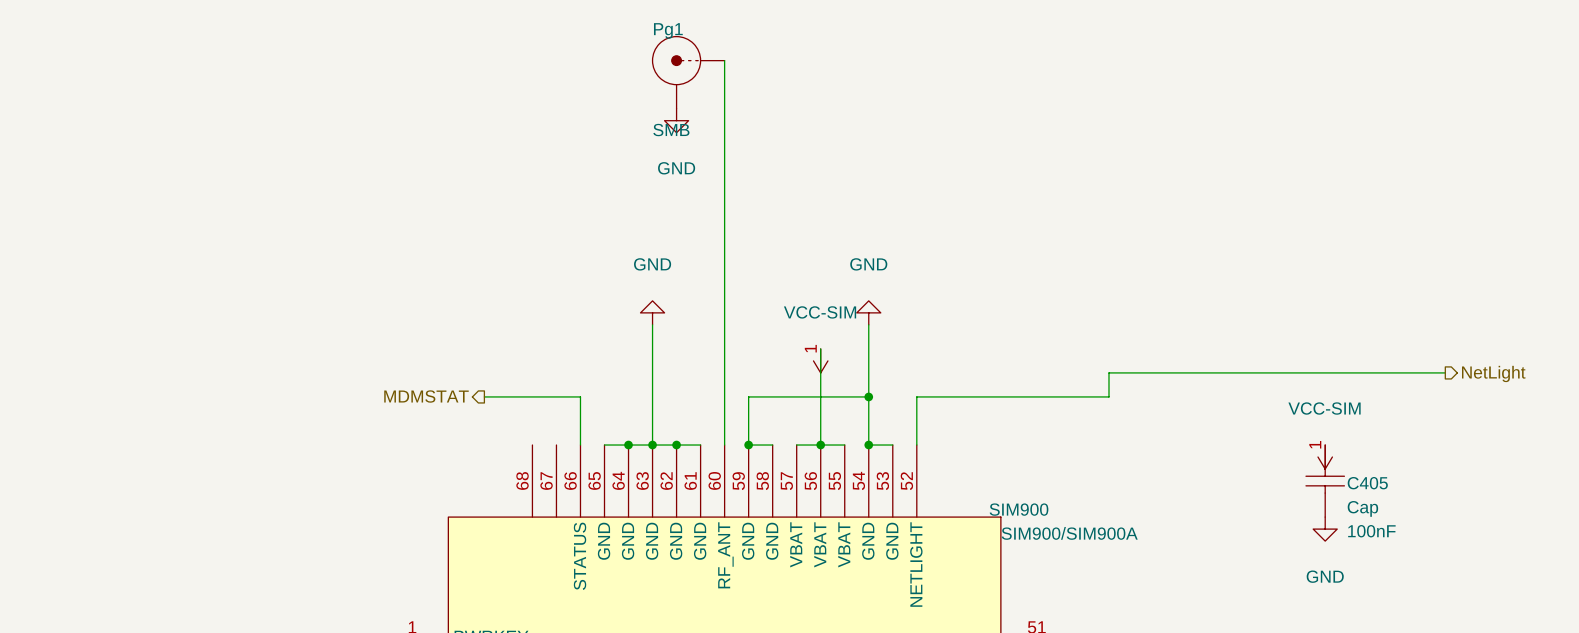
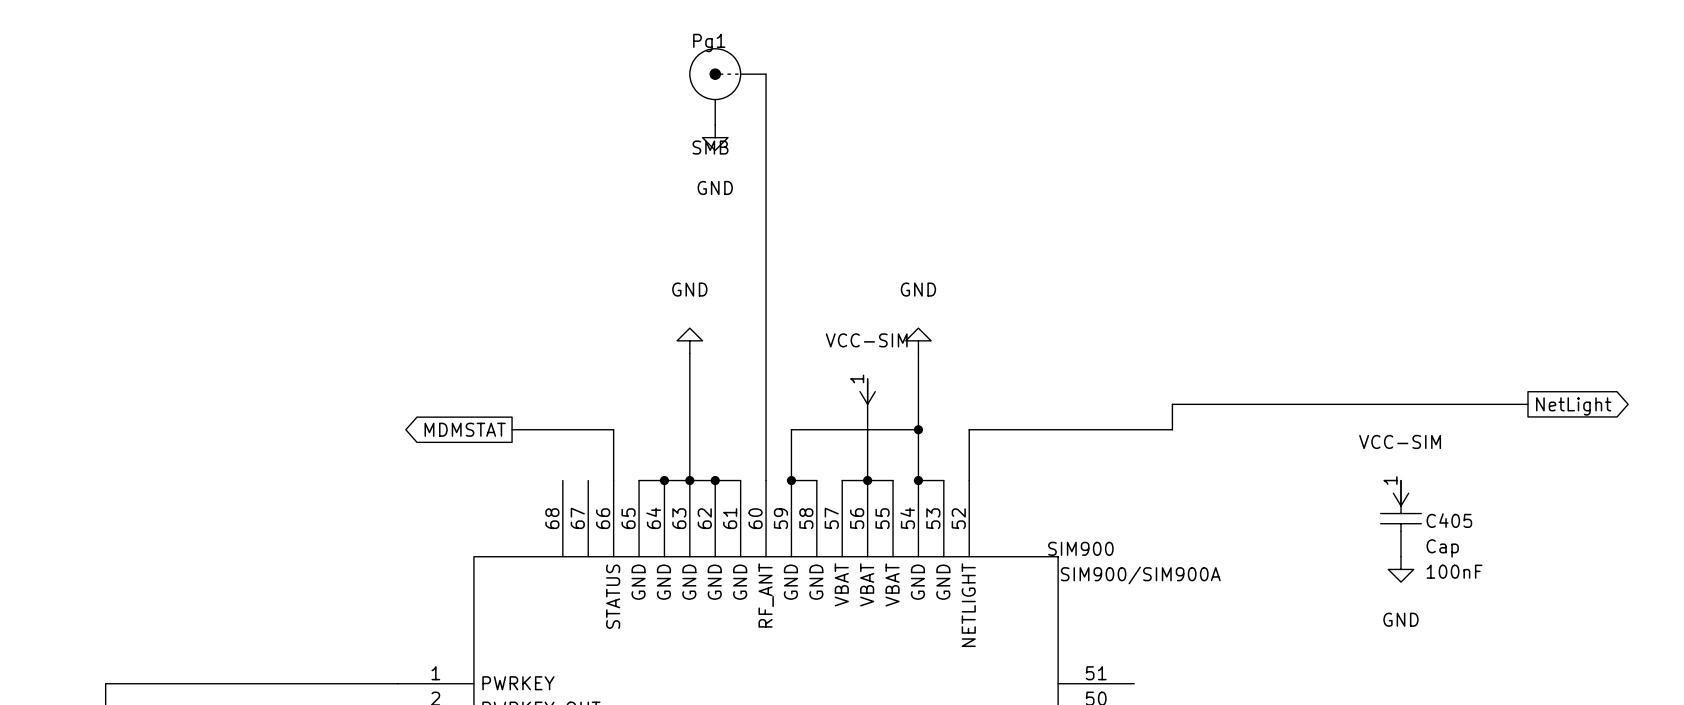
hierarchical label: NetLight (1493, 373) -> none
global label: none -> NetLight (1573, 406)
hierarchical label: MDMSTAT (426, 396) -> none
global label: none -> MDMSTAT (465, 429)

